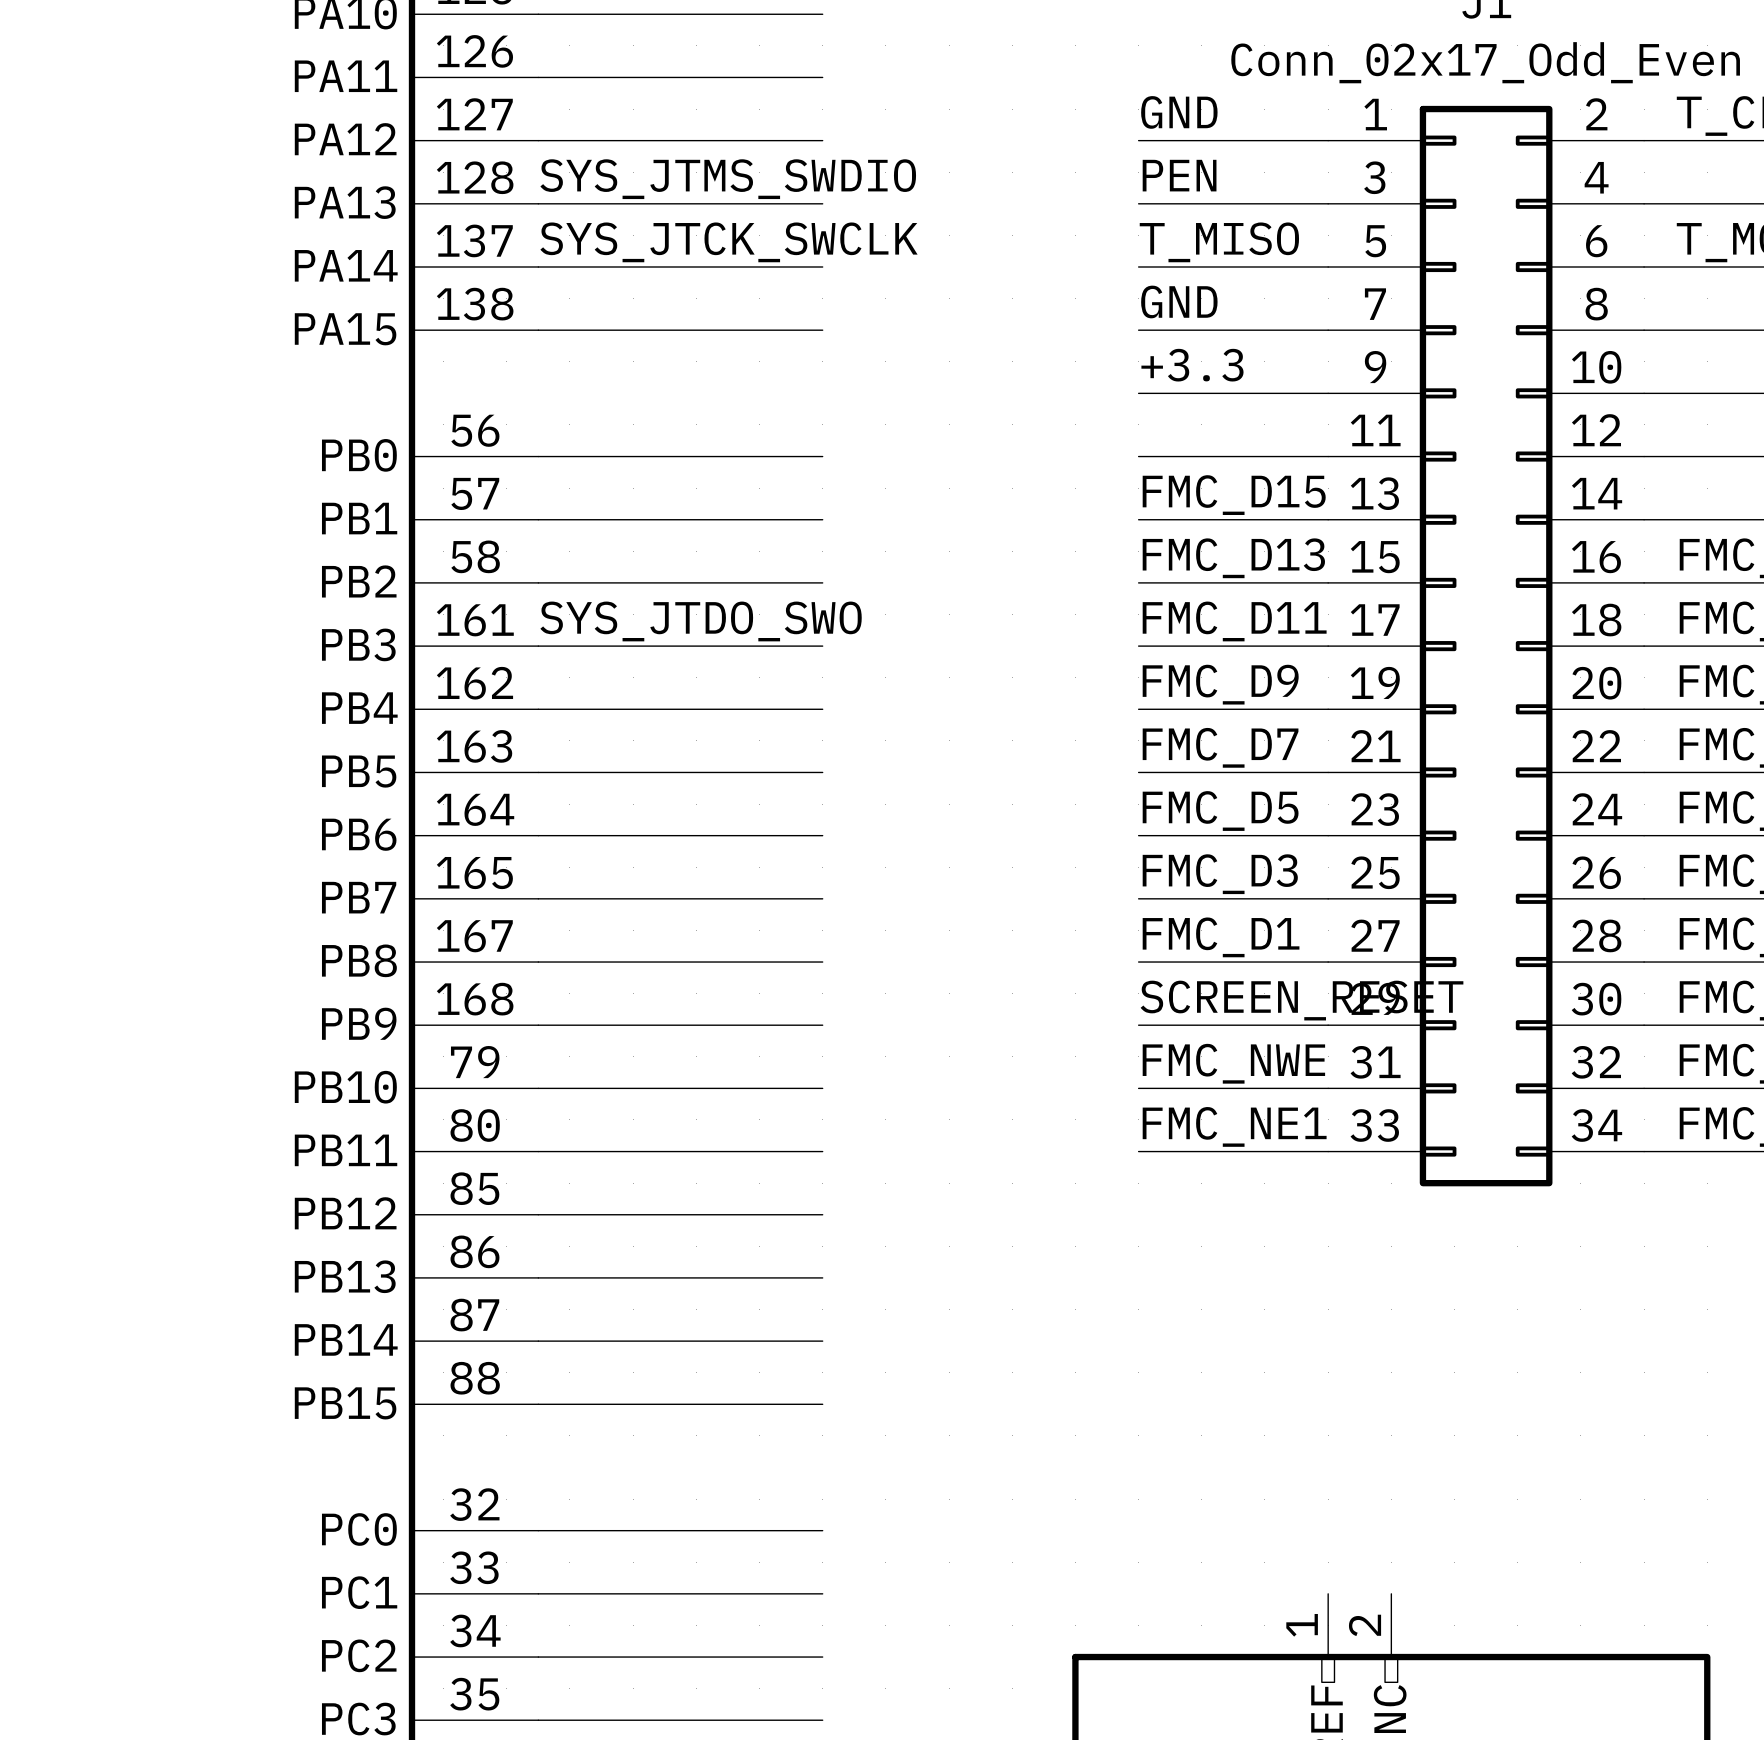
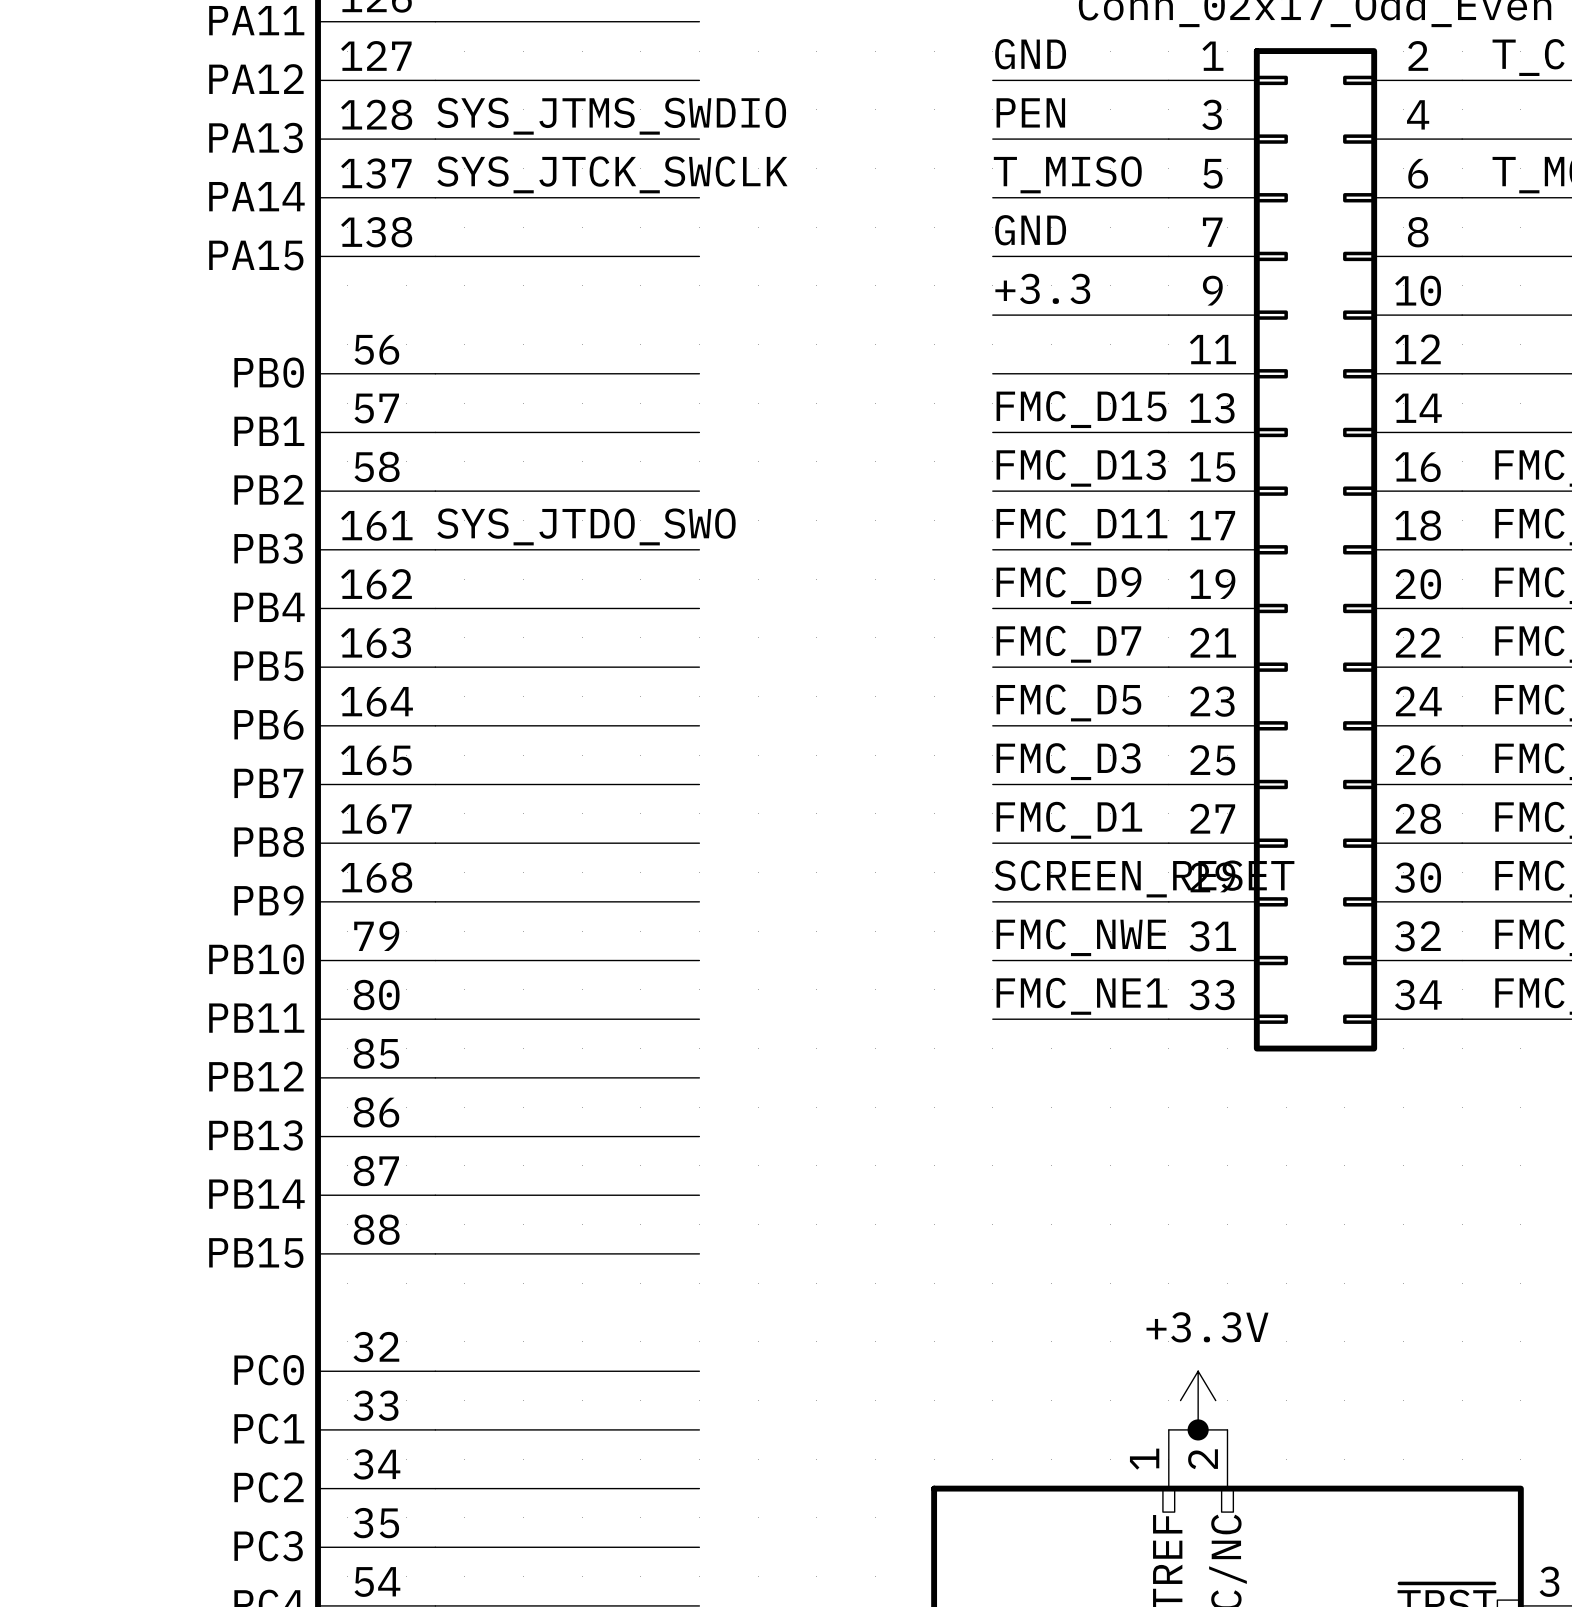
power symbol: none -> +3.3V (1198, 1400)
wire: none -> (1168, 1429) (1227, 1429)
junction: none -> (1198, 1429)

